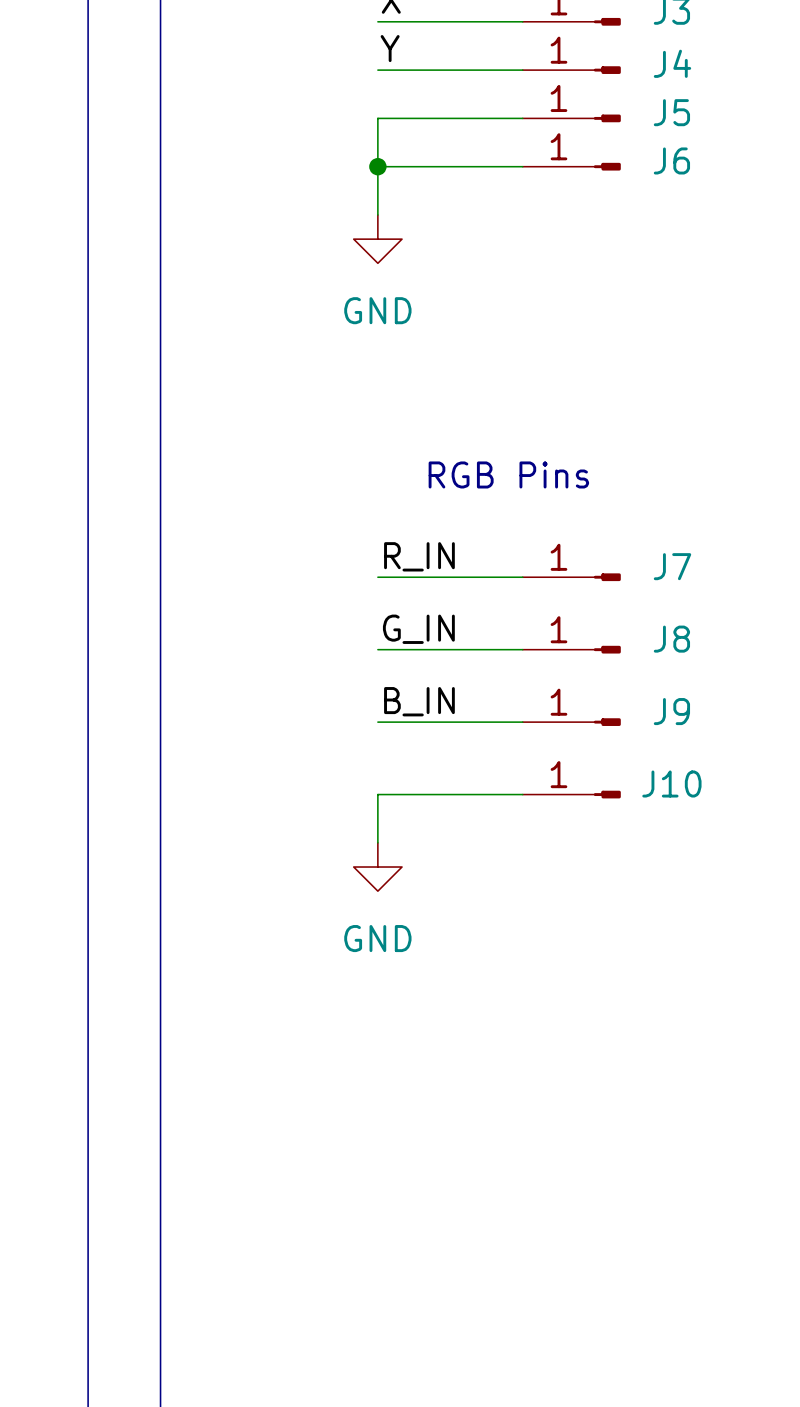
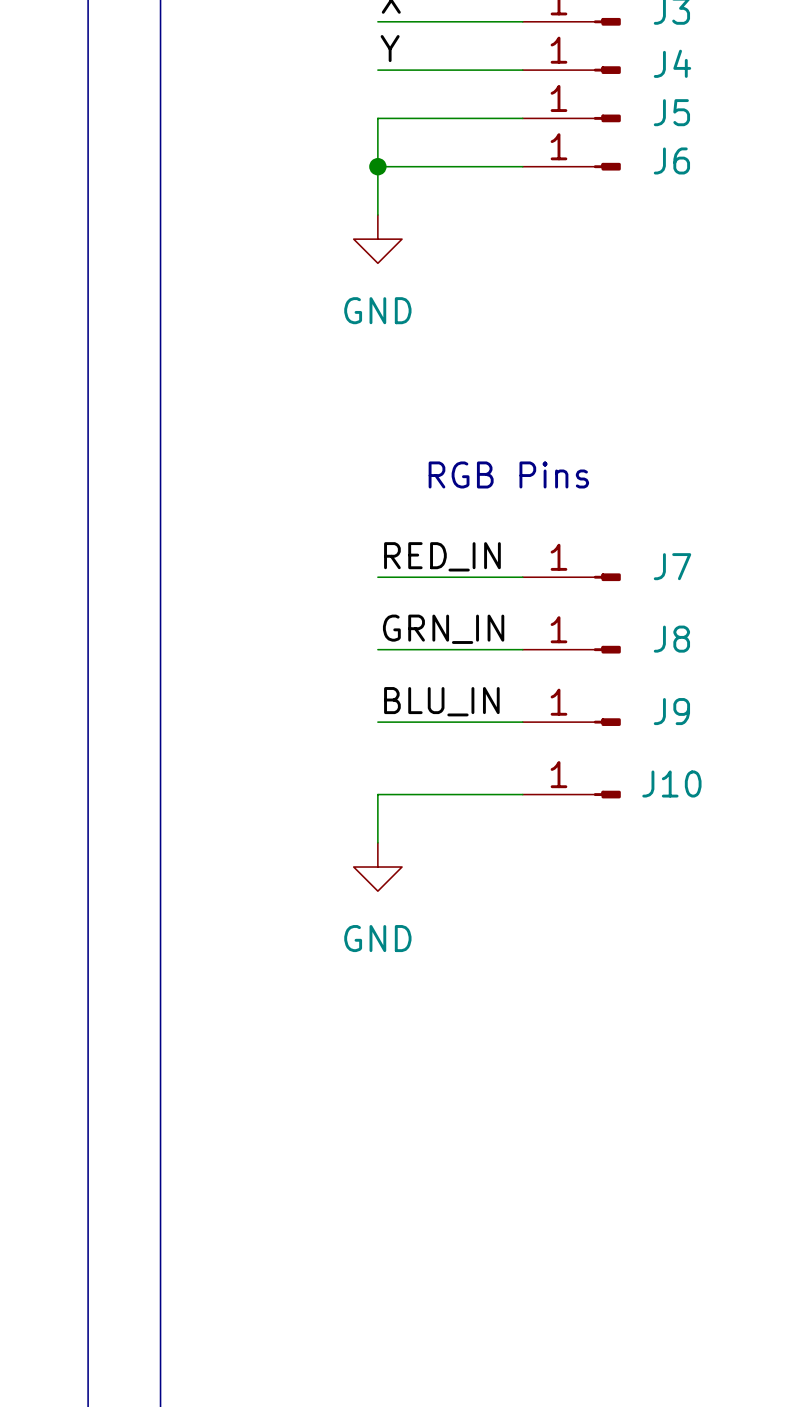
label: R_IN (419, 556) -> RED_IN (442, 556)
label: G_IN (418, 629) -> GRN_IN (443, 629)
label: B_IN (419, 701) -> BLU_IN (441, 701)

